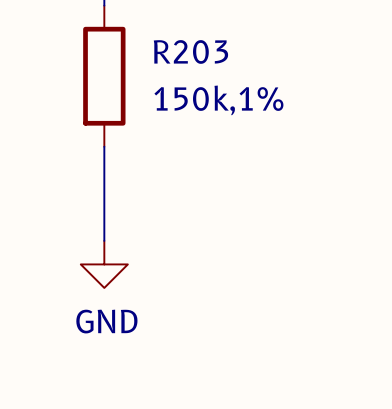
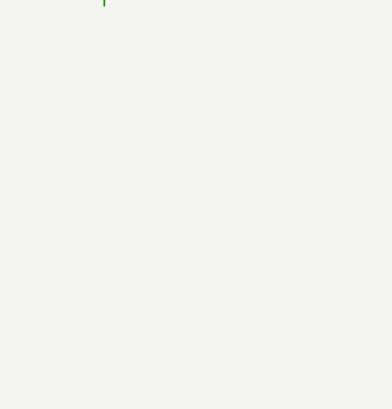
R203: 150k,1% (104, 76) -> none
wire: (104, 146) (104, 240) -> none
power symbol: GND (104, 264) -> none

